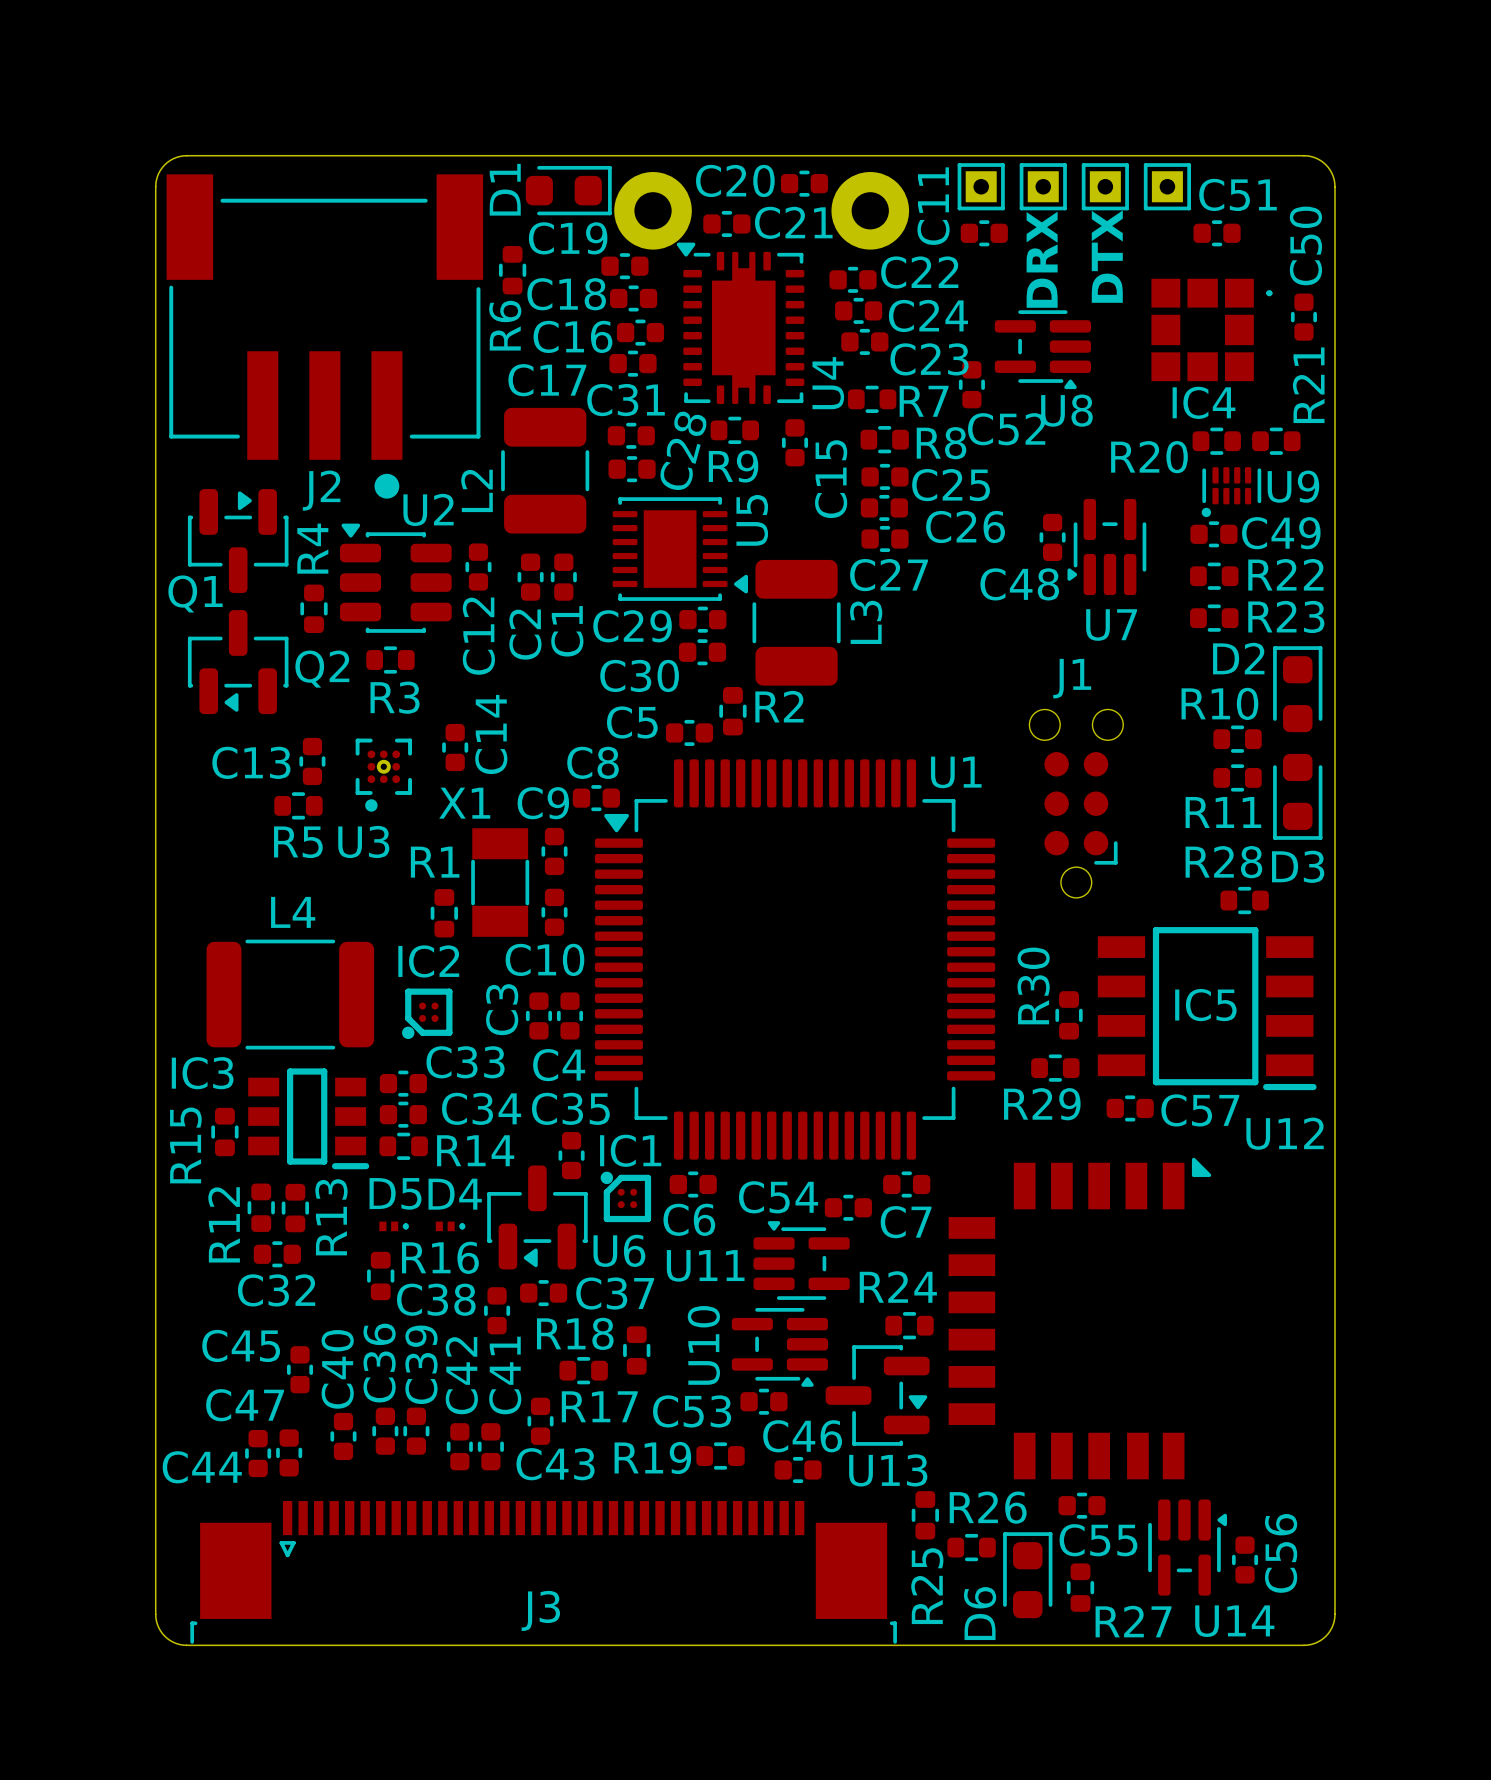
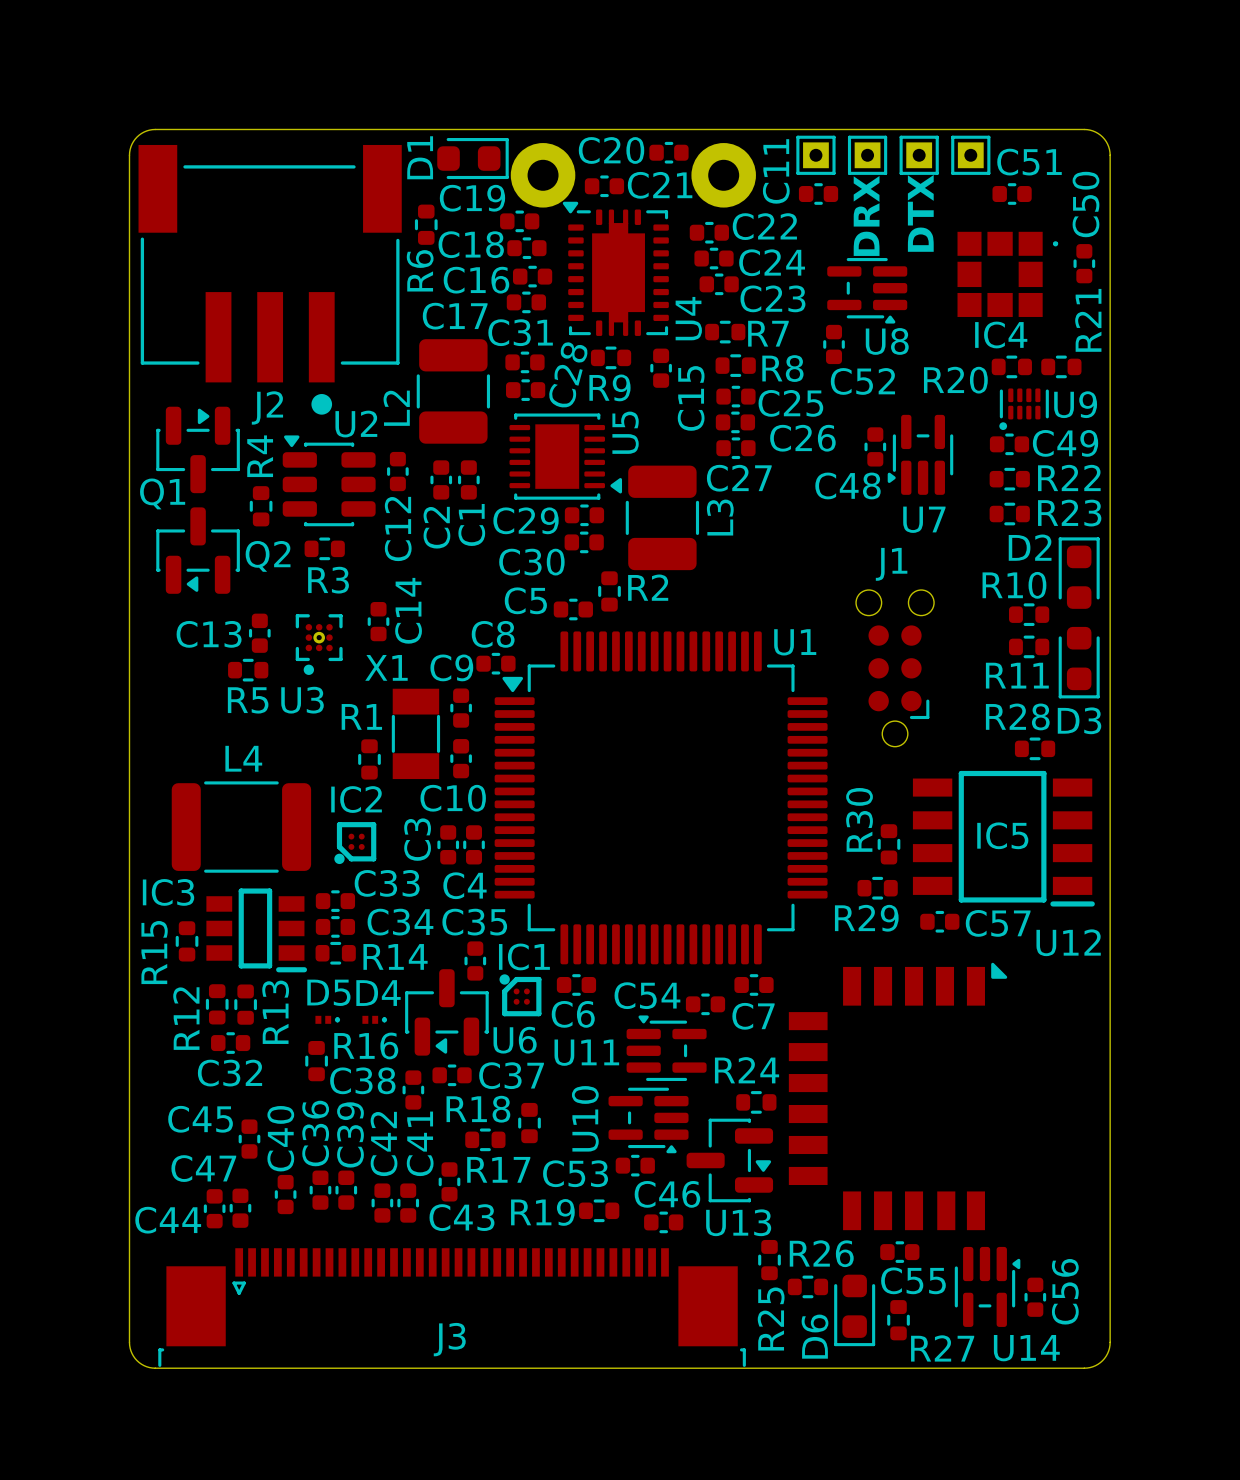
C52 position: (971, 384) -> (834, 344)
D6 rotation: 0° (1027, 1575) -> 180° (854, 1310)

